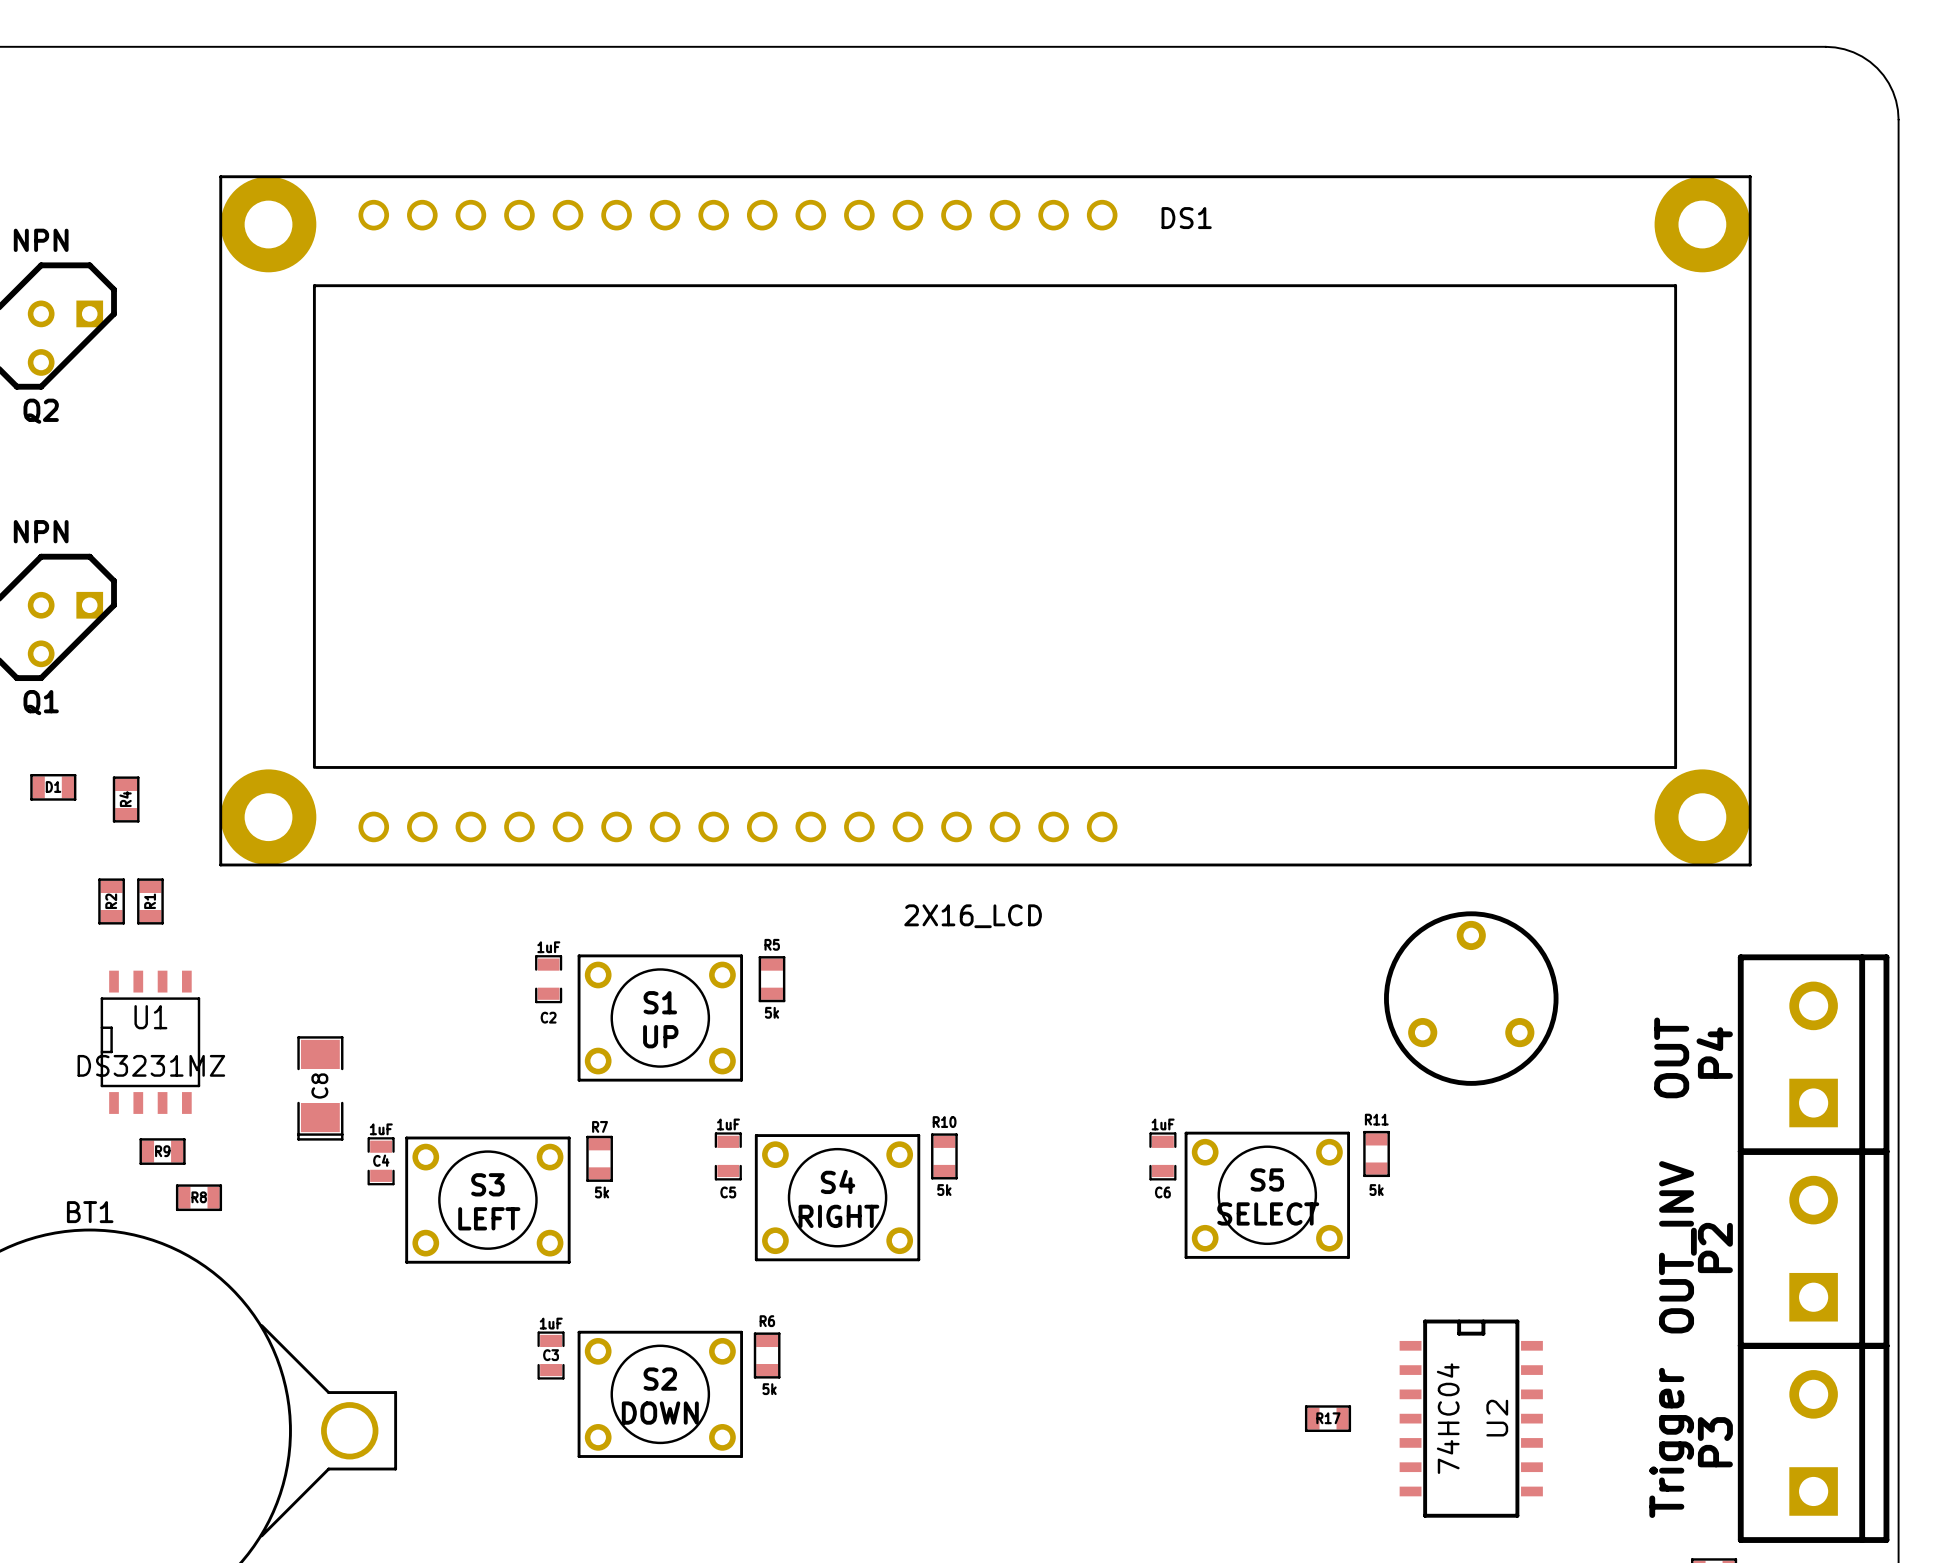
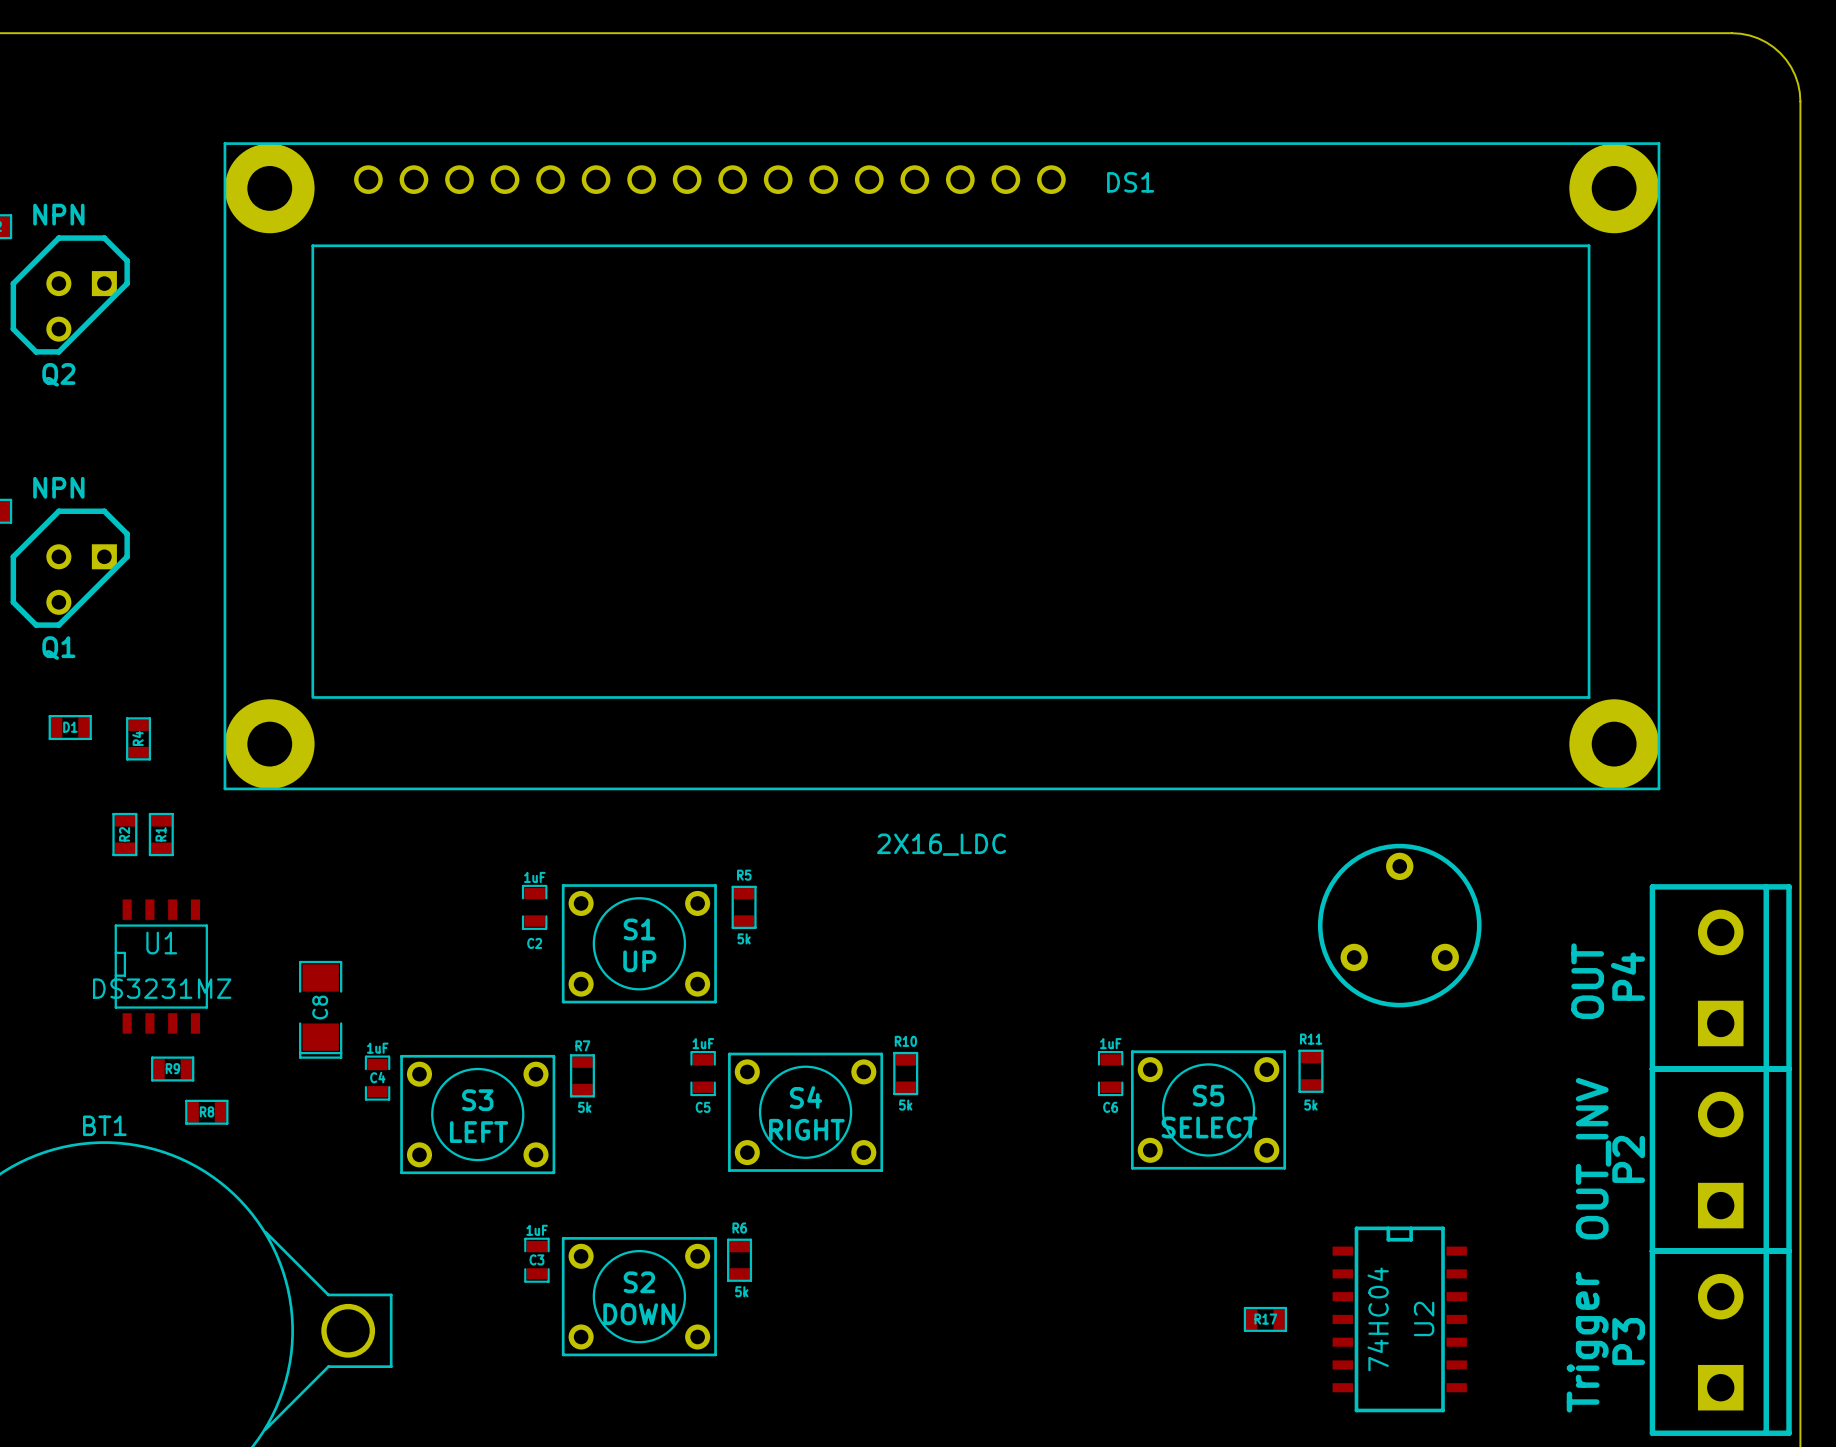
DS1 footprint: [219, 175, 1752, 867] -> [223, 142, 1661, 791]
DS1 value: 2X16_LCD (973, 916) -> 2X16_LDC (941, 844)

